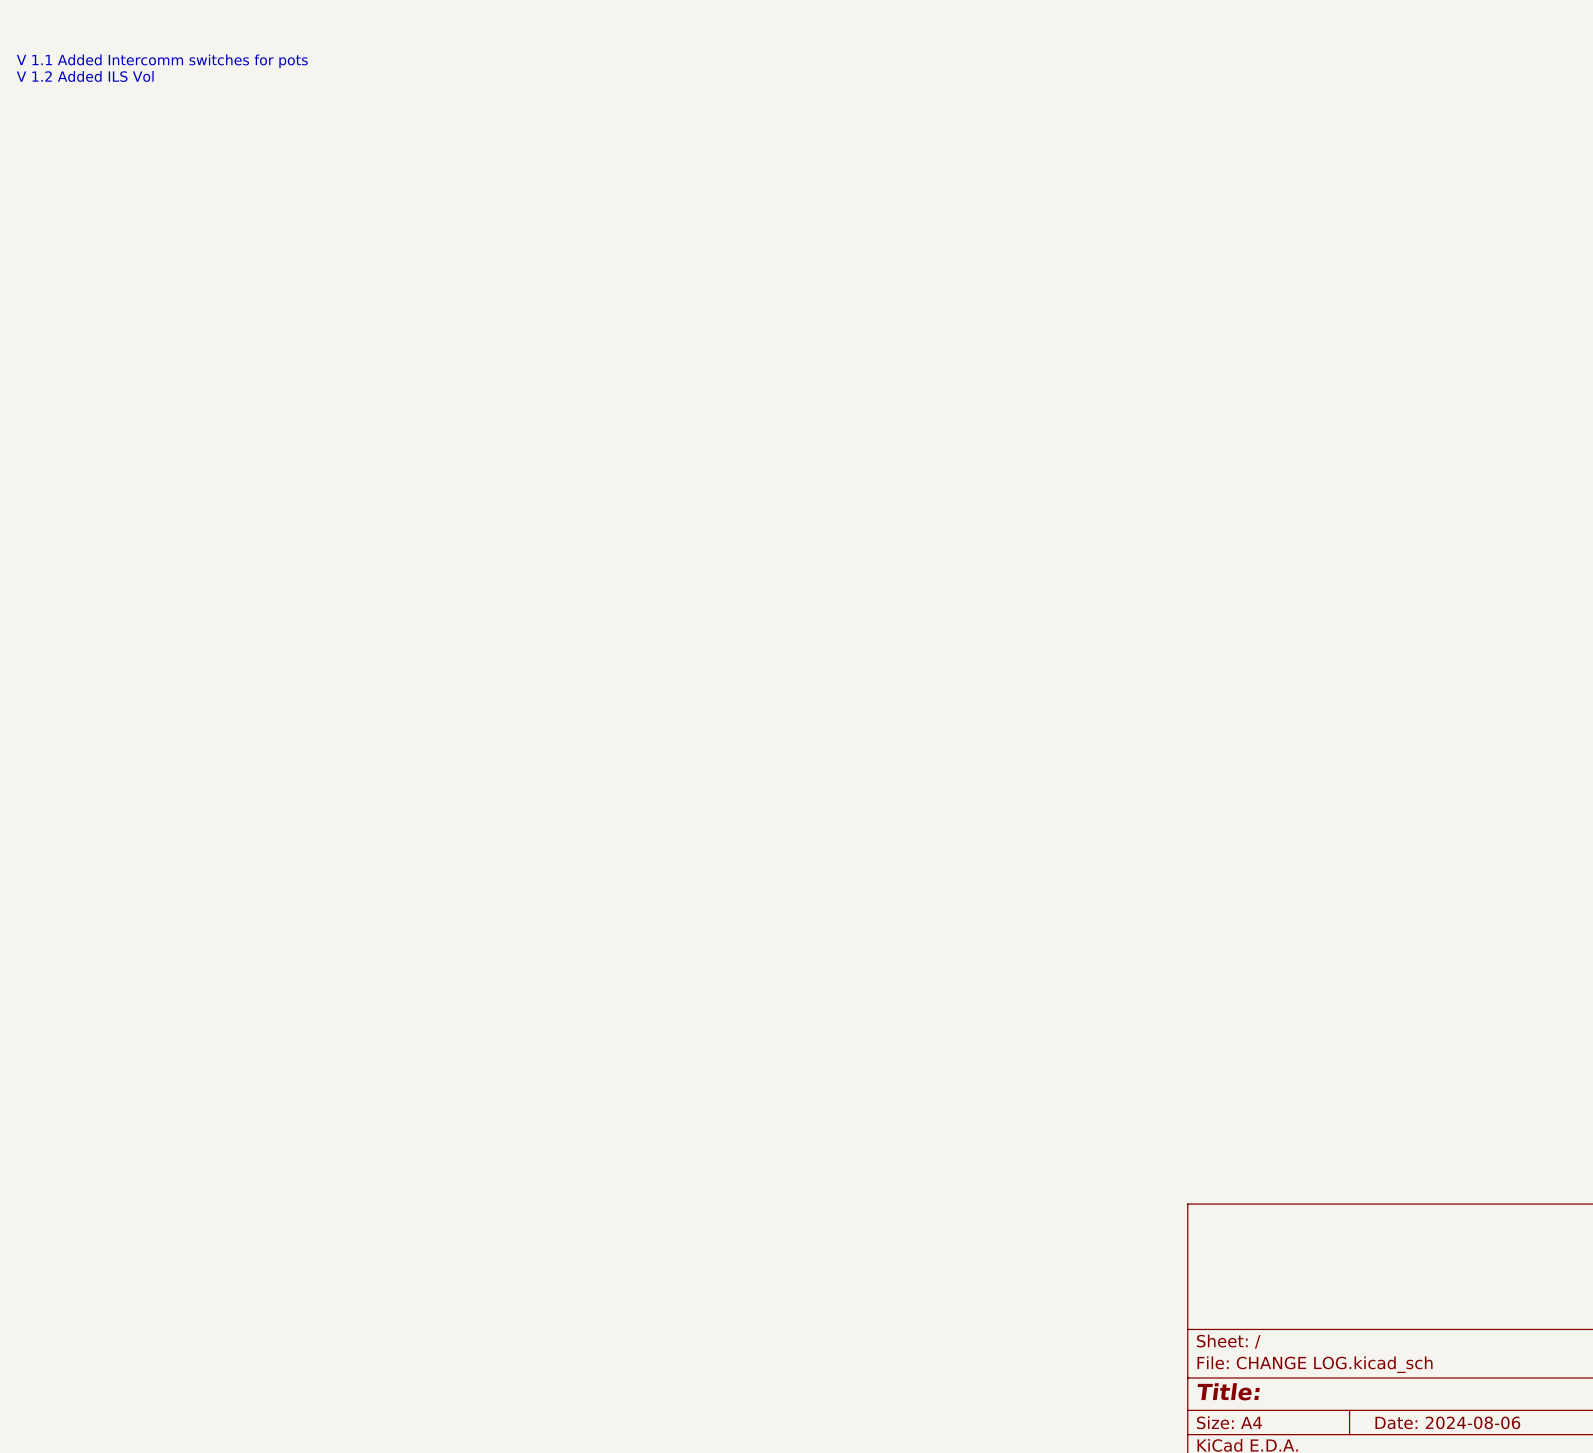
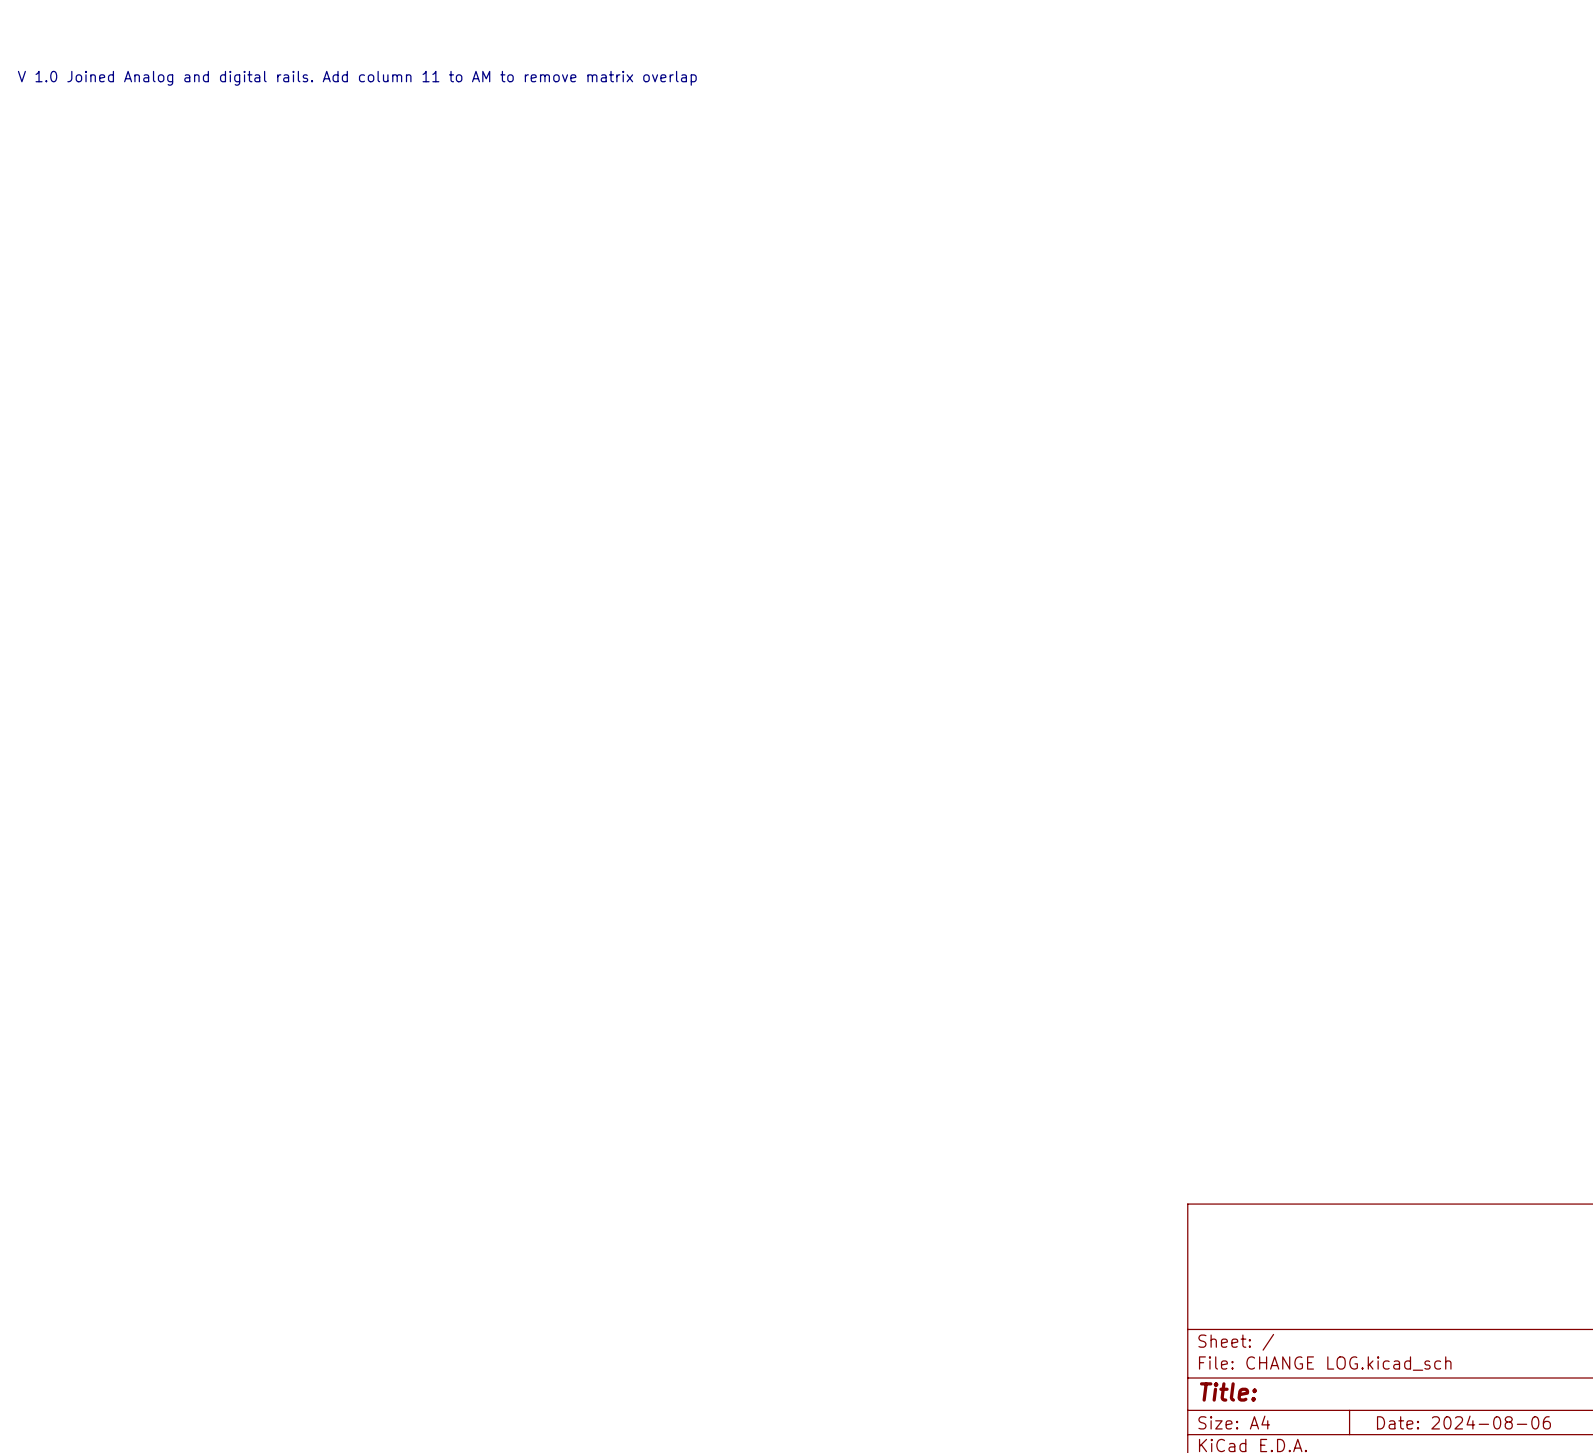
text: V 1.1 Added Intercomm switches for pots (162, 61) -> none
text: V 1.2 Added ILS Vol (85, 76) -> V 1.0 Joined Analog and digital rails. Add column 11 to AM to remove matrix overlap (357, 78)

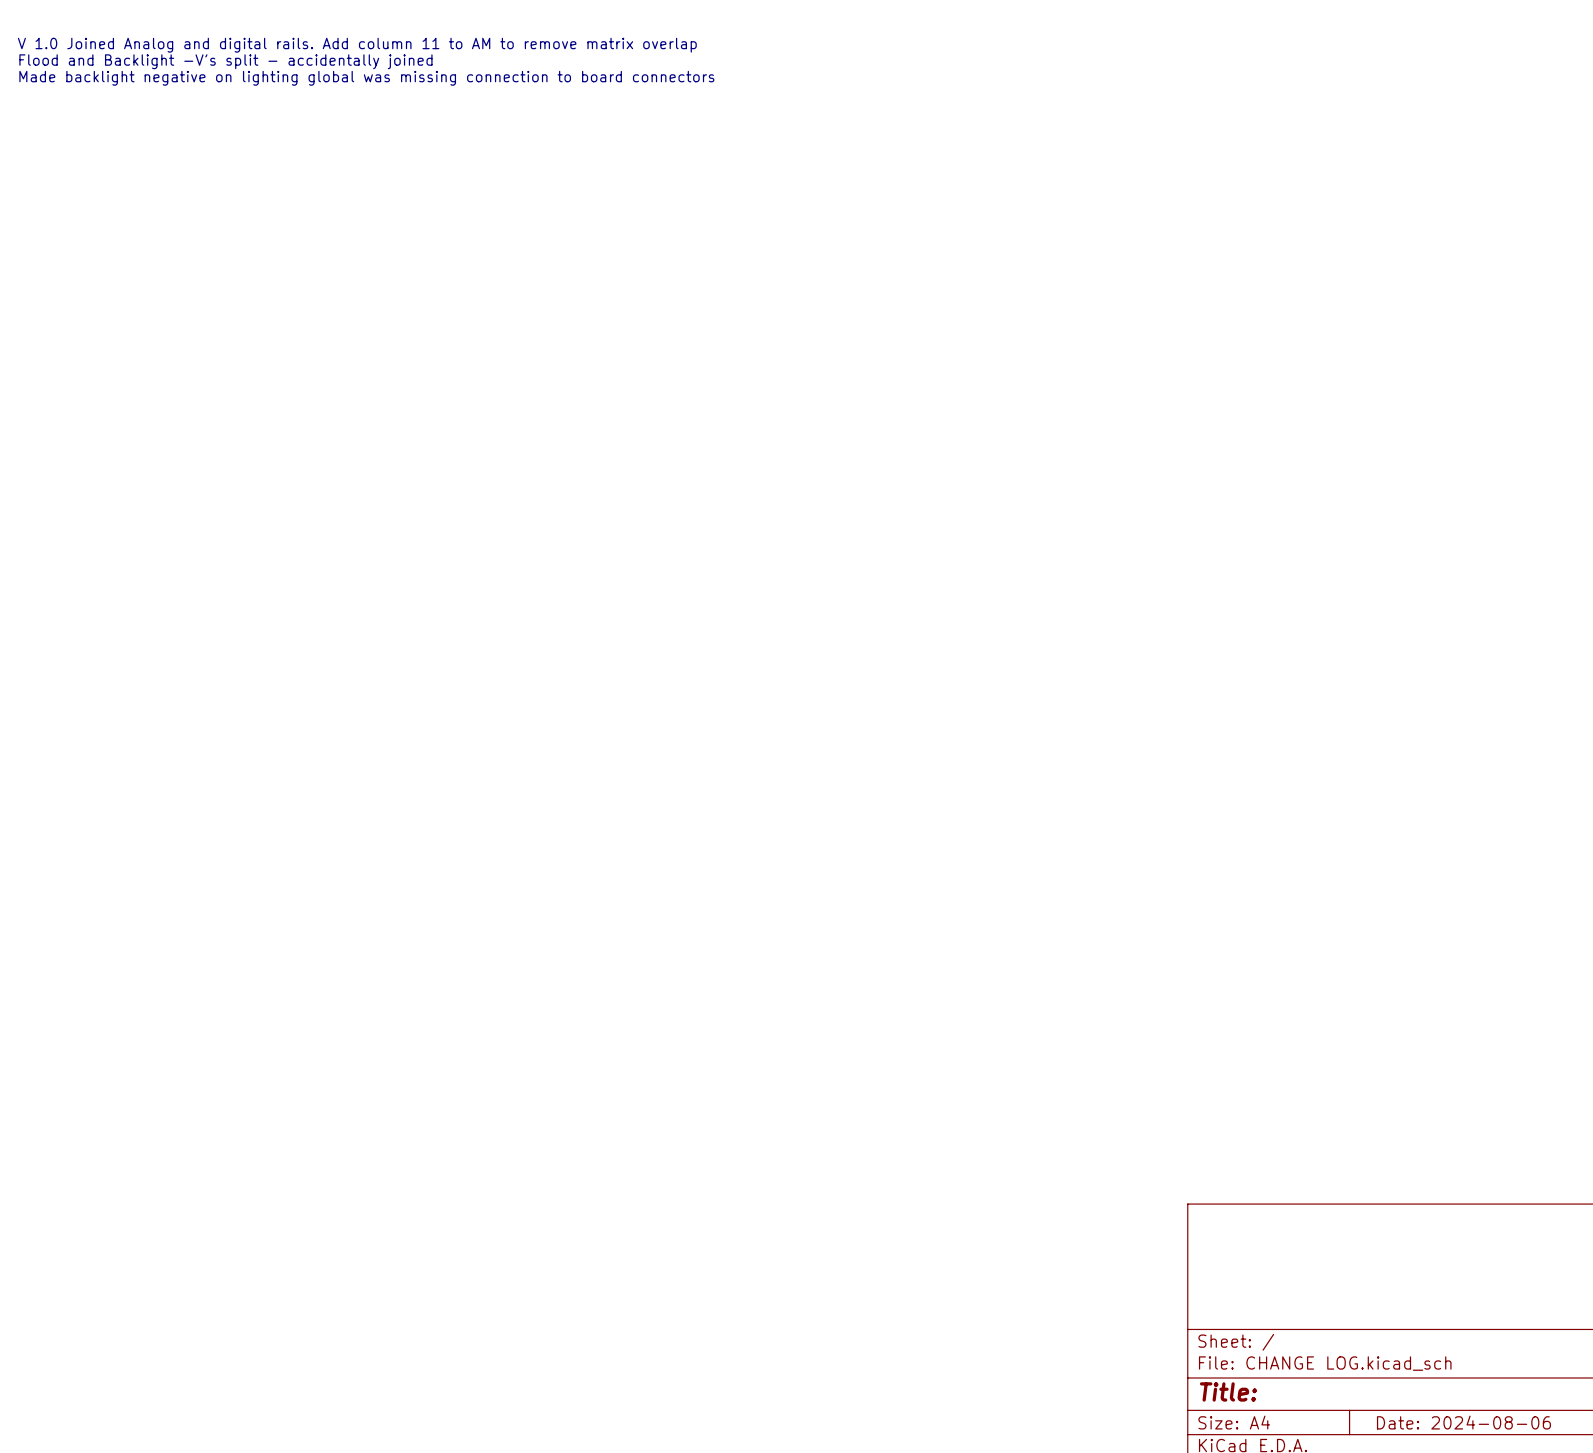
text: none -> V 1.0 Joined Analog and digital rails. Add column 11 to AM to remove matrix overlap (357, 45)
text: none -> Flood and Backlight -V's split - accidentally joined (225, 61)
text: V 1.0 Joined Analog and digital rails. Add column 11 to AM to remove matrix overlap (357, 78) -> Made backlight negative on lighting global was missing connection to board connectors (366, 78)

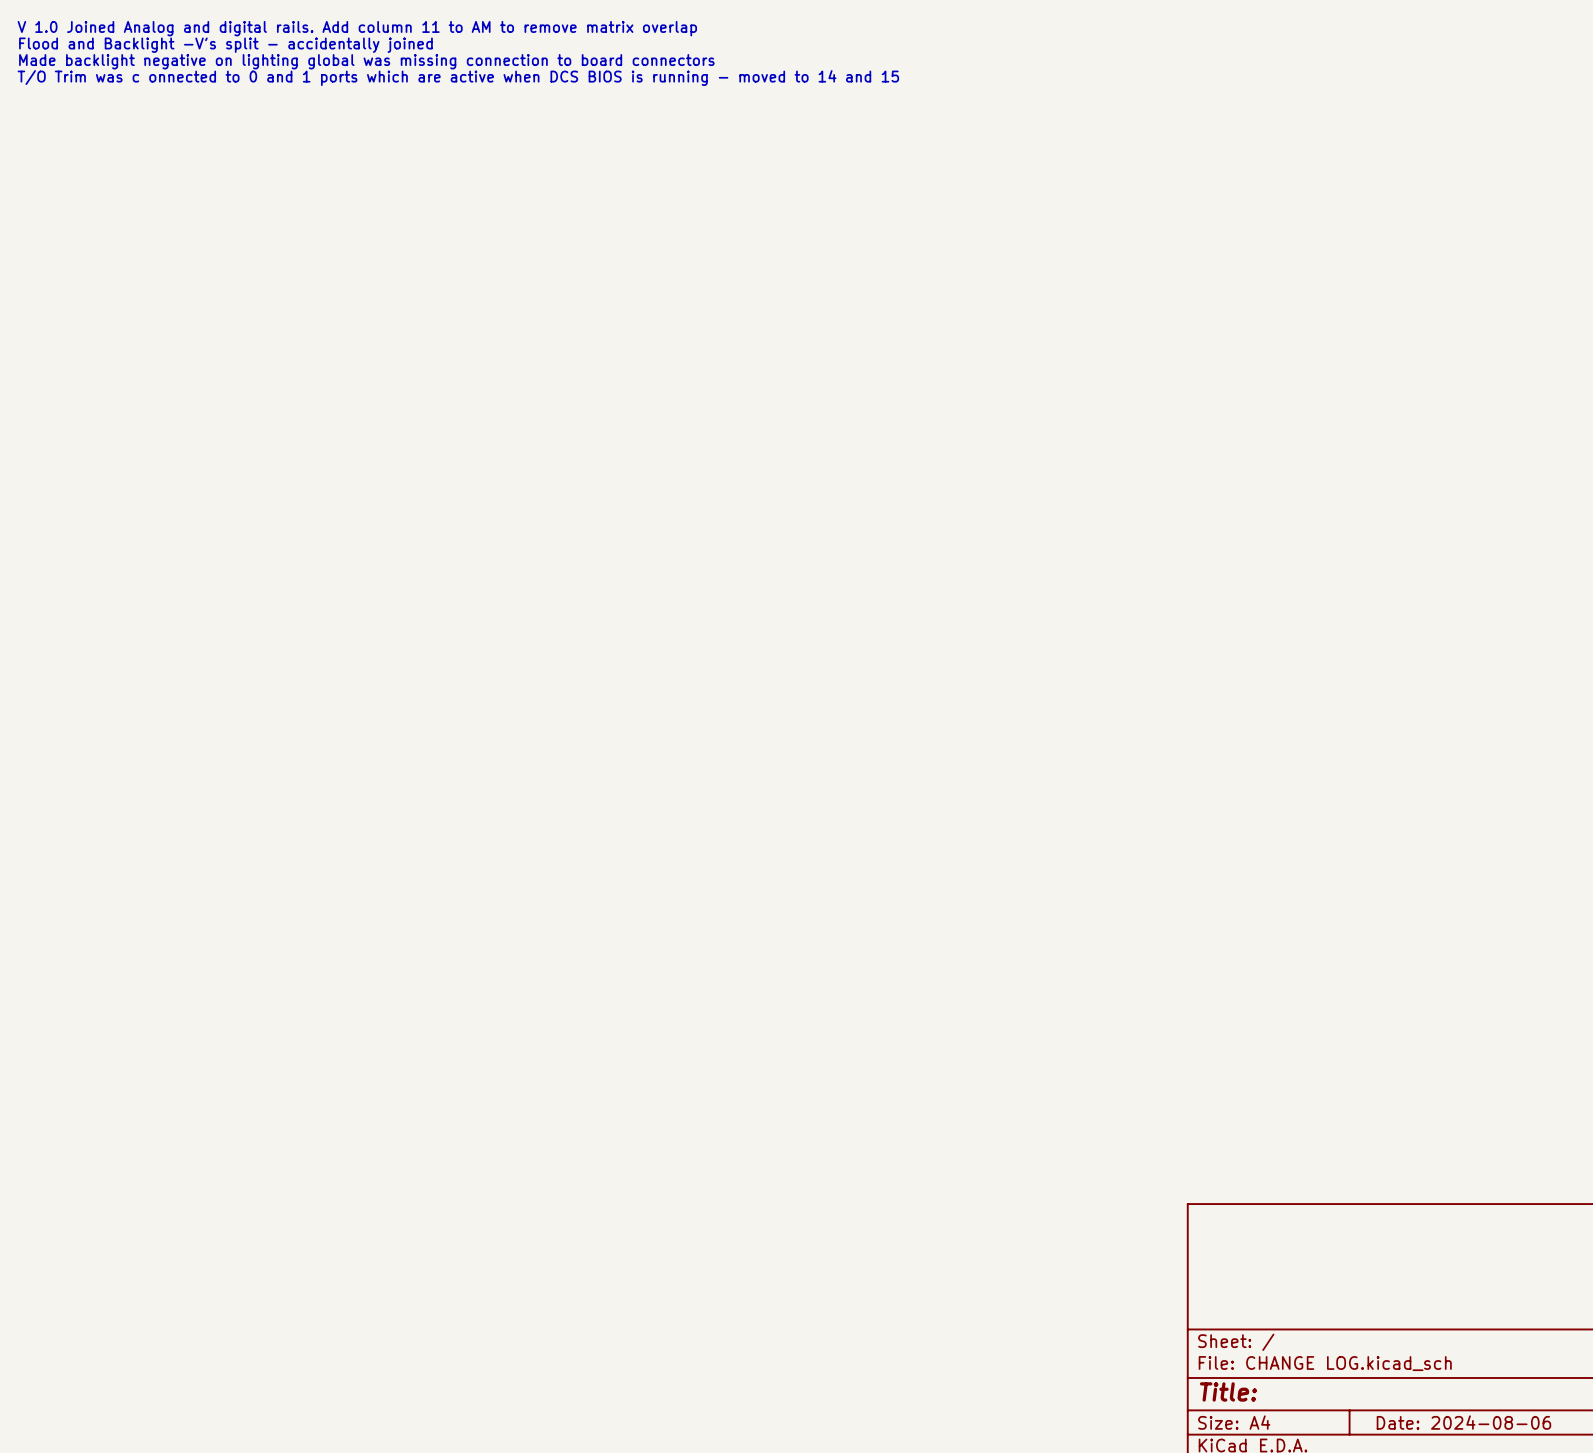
text: none -> V 1.0 Joined Analog and digital rails. Add column 11 to AM to remove matrix overlap (357, 28)
text: V 1.0 Joined Analog and digital rails. Add column 11 to AM to remove matrix overlap (357, 45) -> Flood and Backlight -V's split - accidentally joined (225, 45)
text: Flood and Backlight -V's split - accidentally joined (225, 61) -> Made backlight negative on lighting global was missing connection to board connectors (366, 61)
text: Made backlight negative on lighting global was missing connection to board connectors (366, 78) -> T/O Trim was c onnected to 0 and 1 ports which are active when DCS BIOS is running - moved to 14 and 15 (458, 78)

